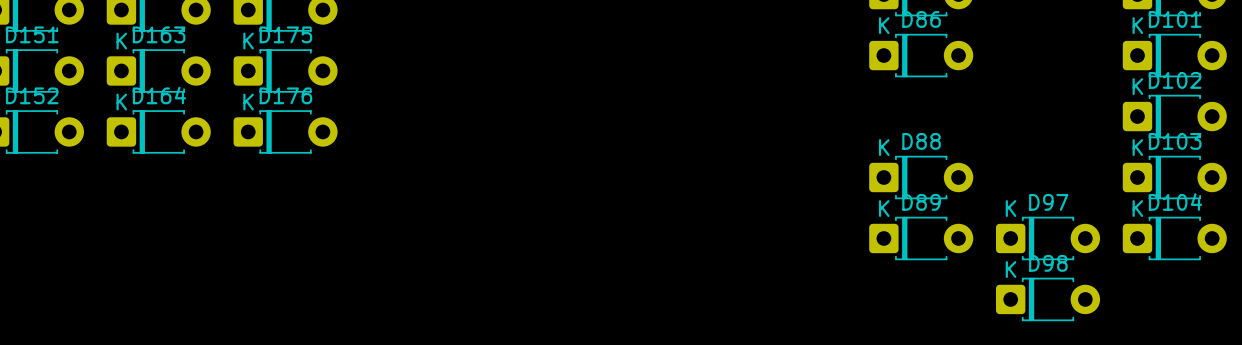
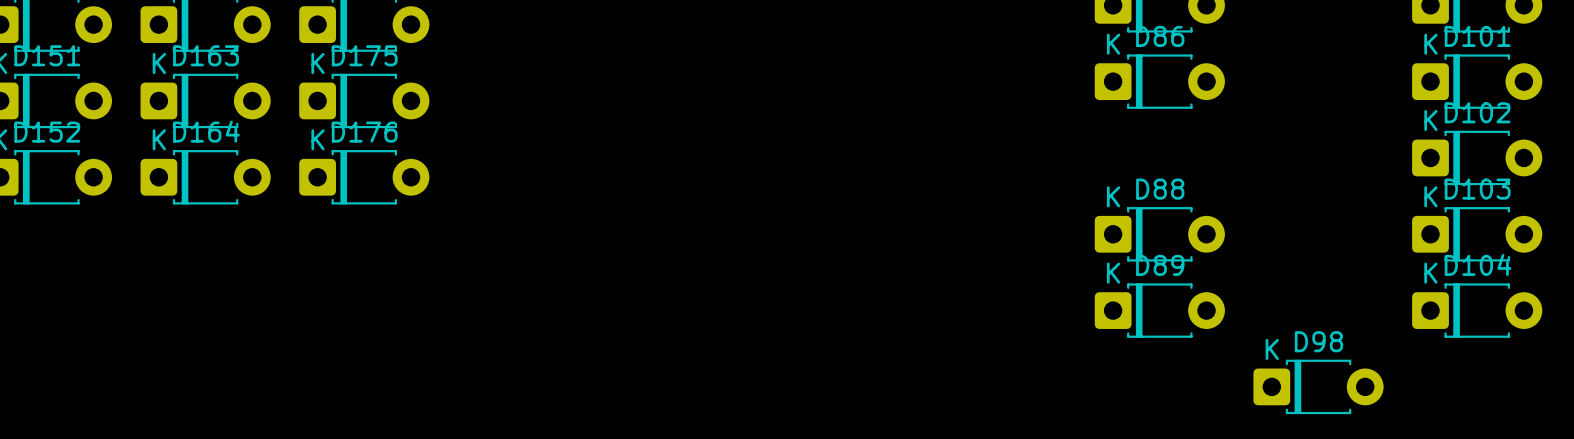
D97: (1048, 238) -> none

